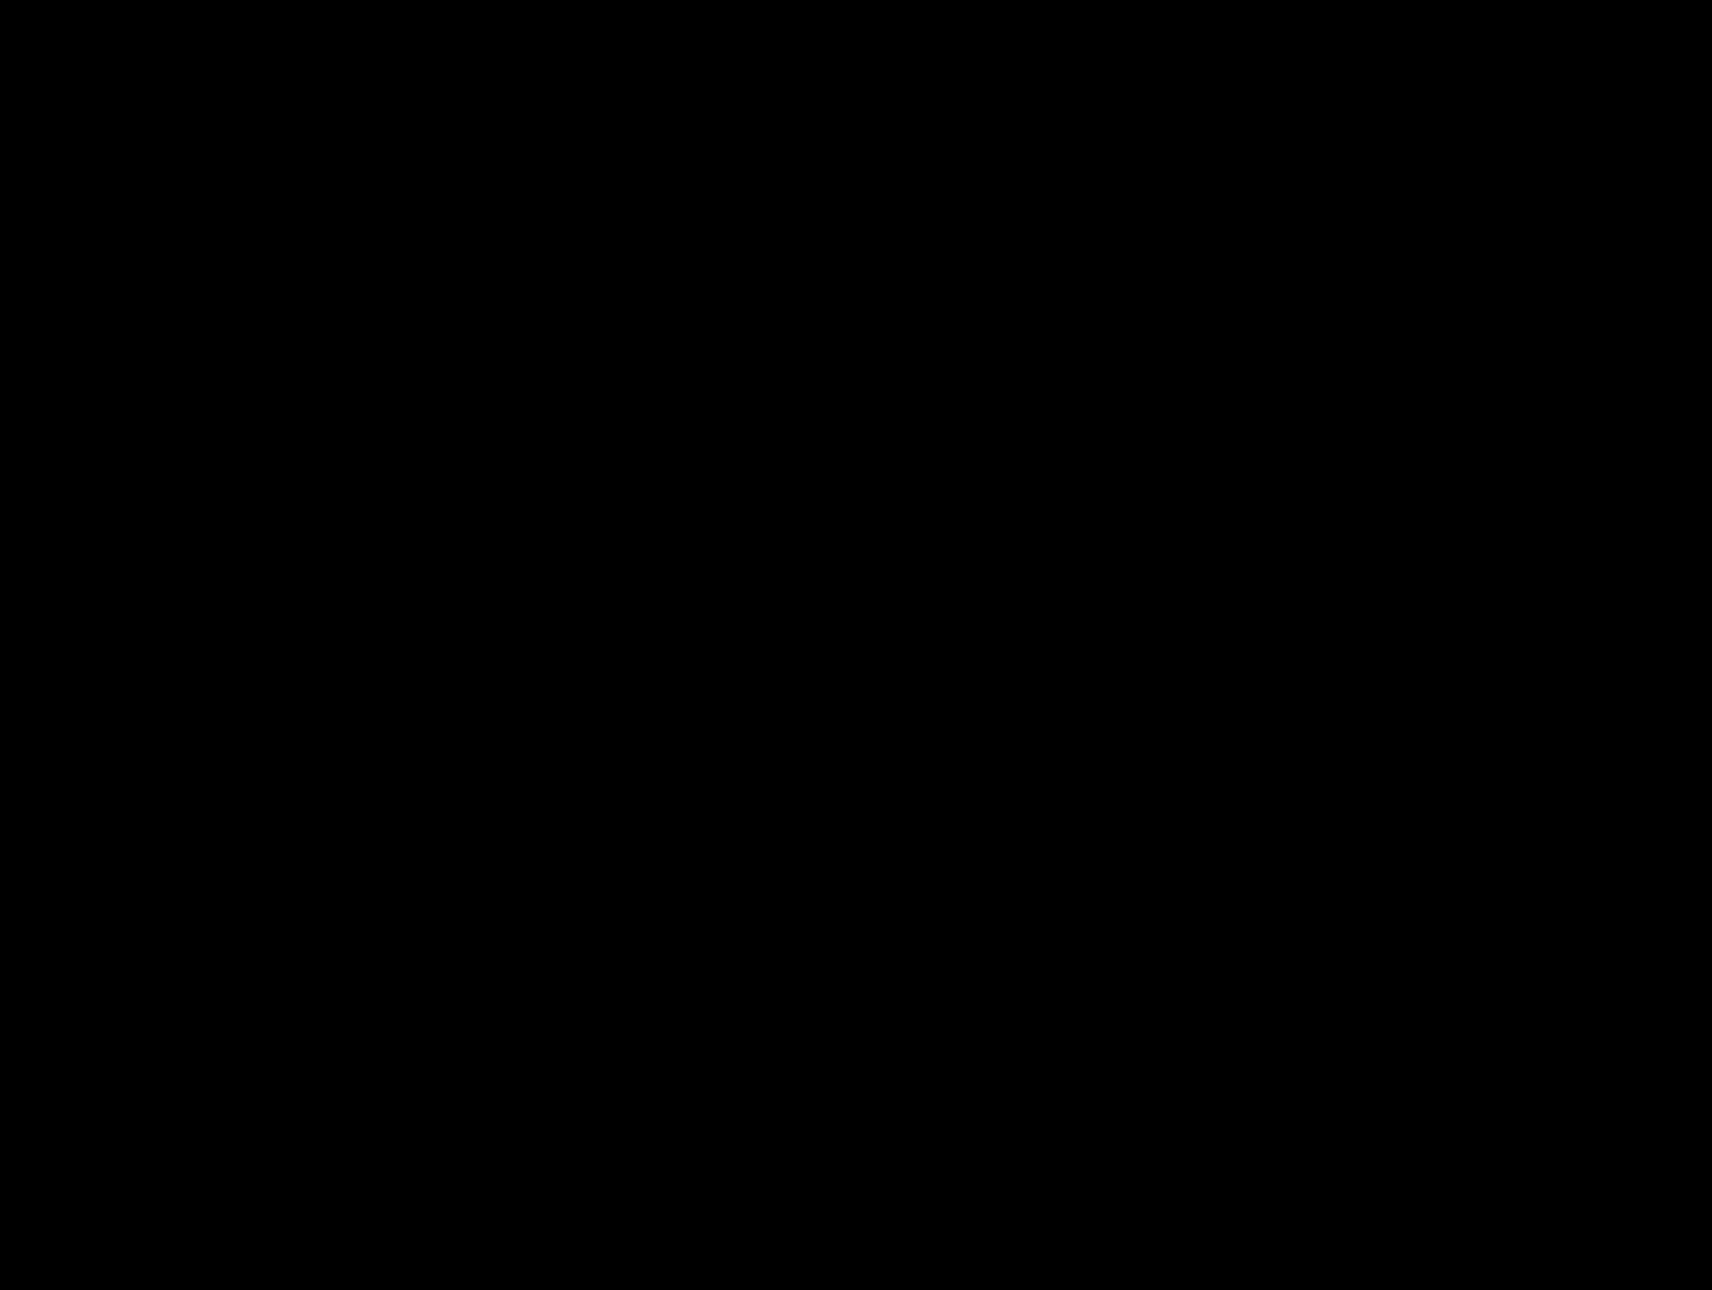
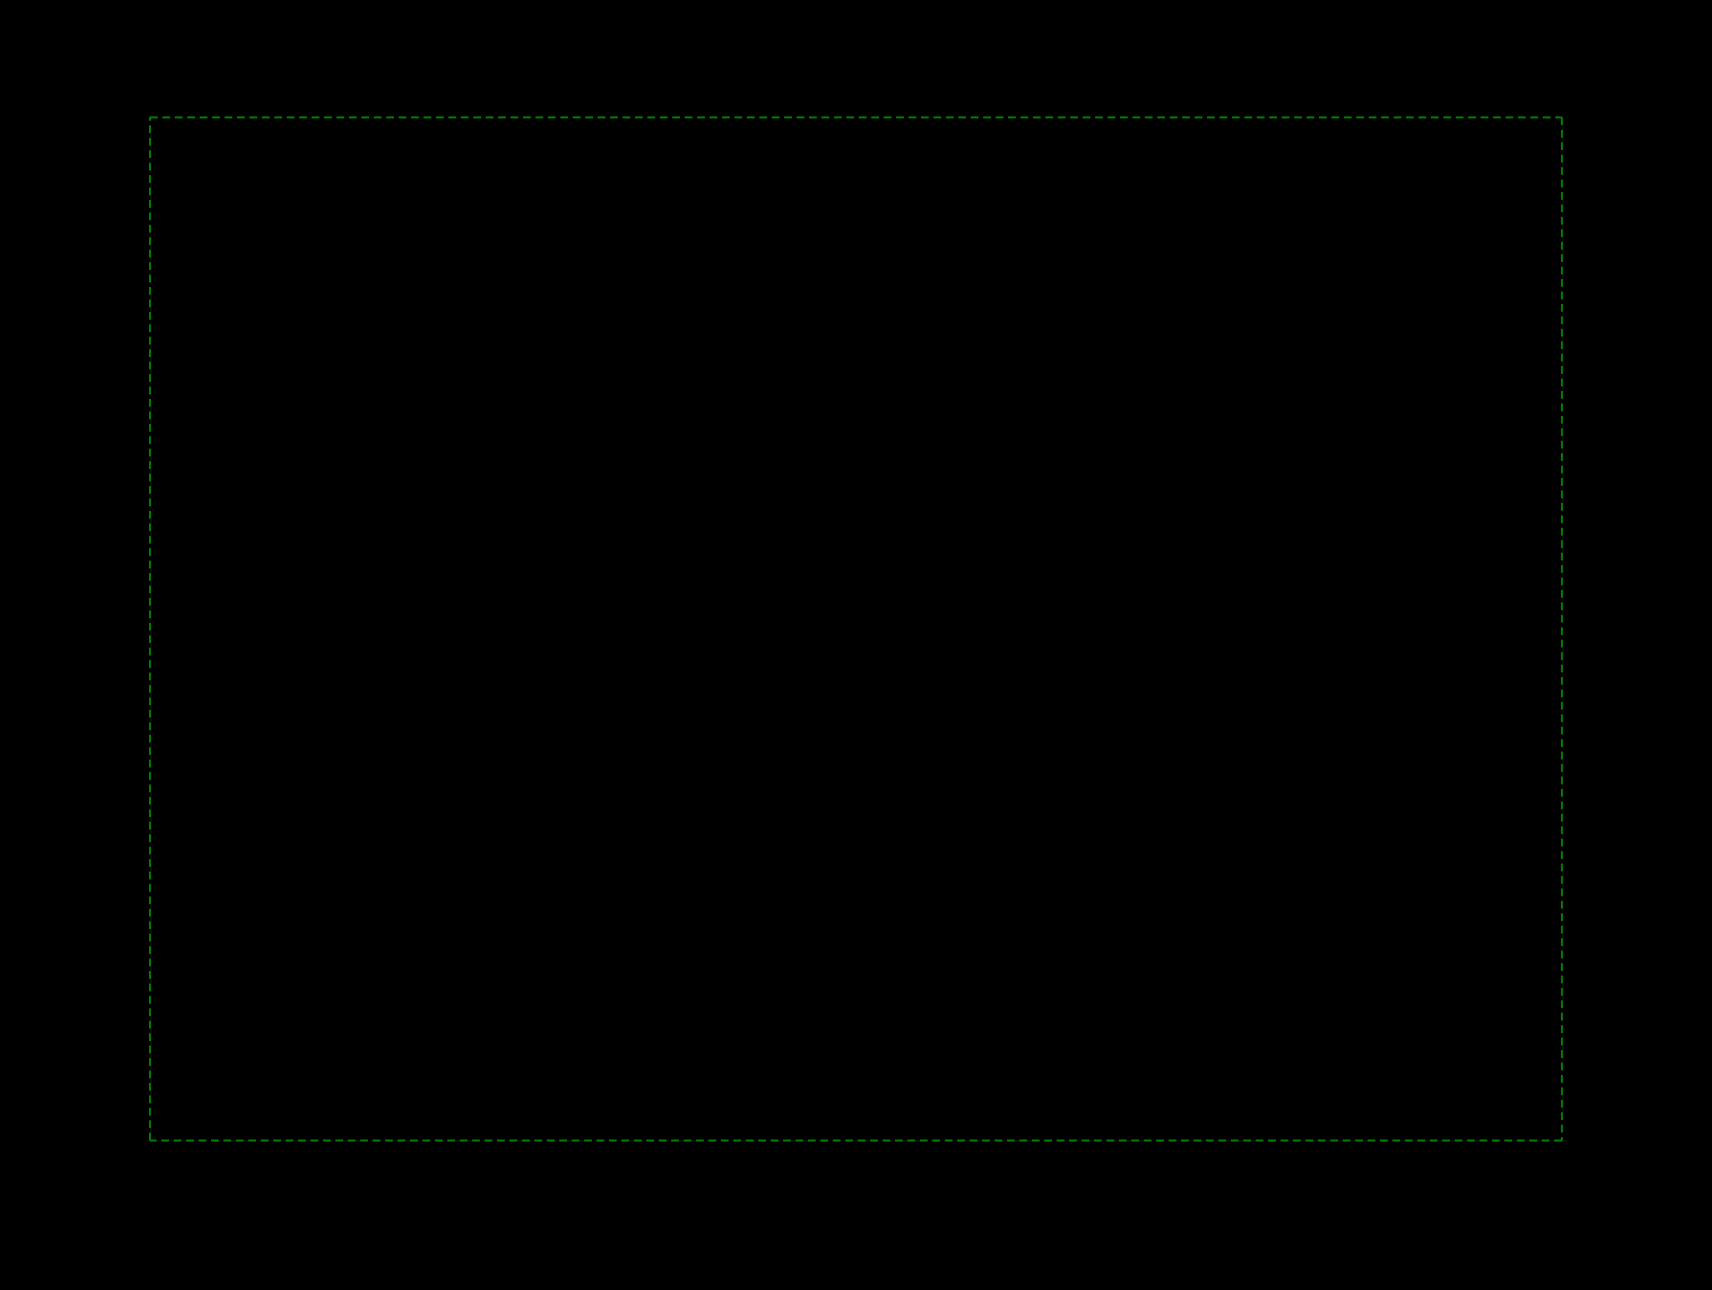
bottom zone outline: none -> (149, 117) (1561, 117) (1561, 1140) (149, 1140) (149, 117)

